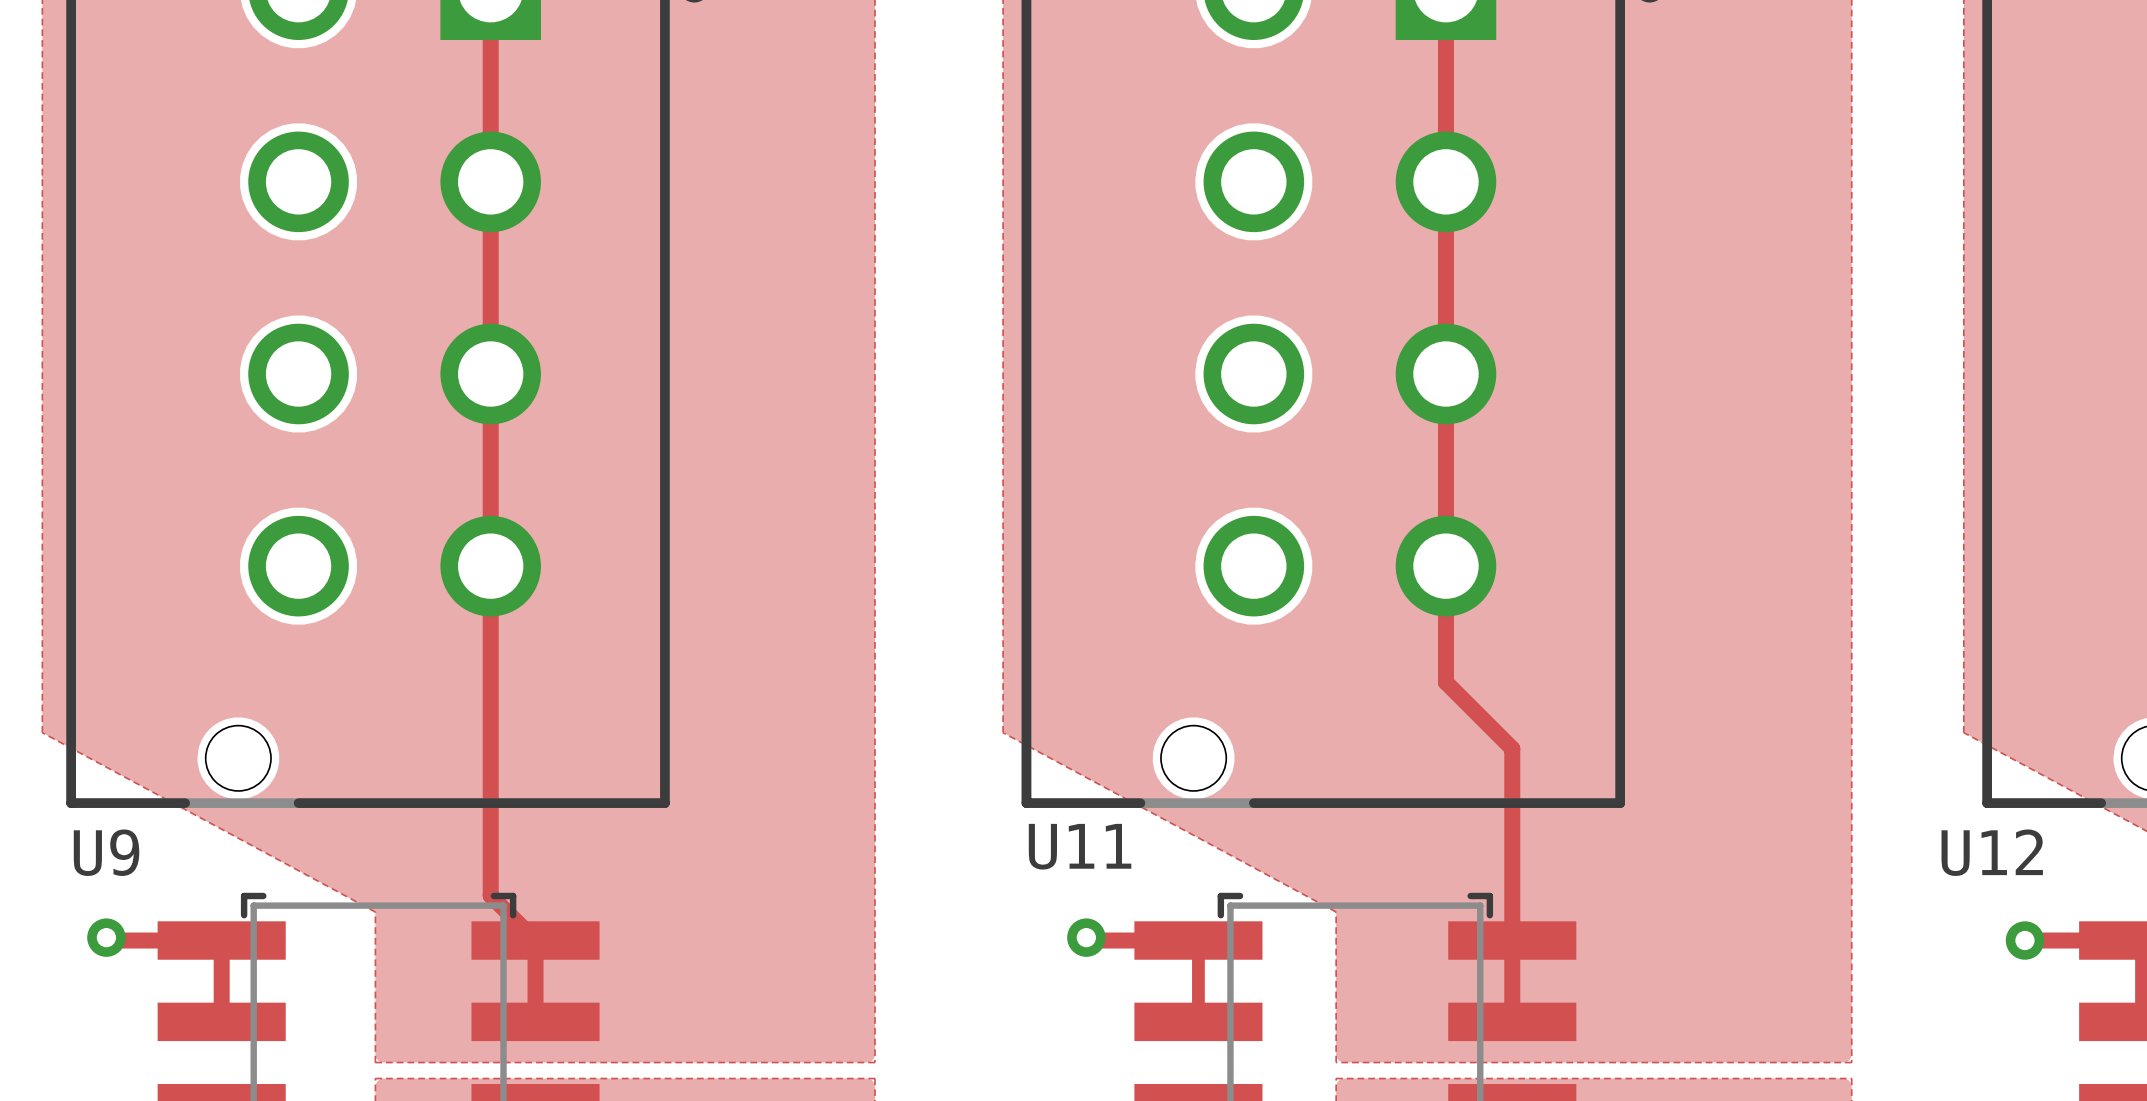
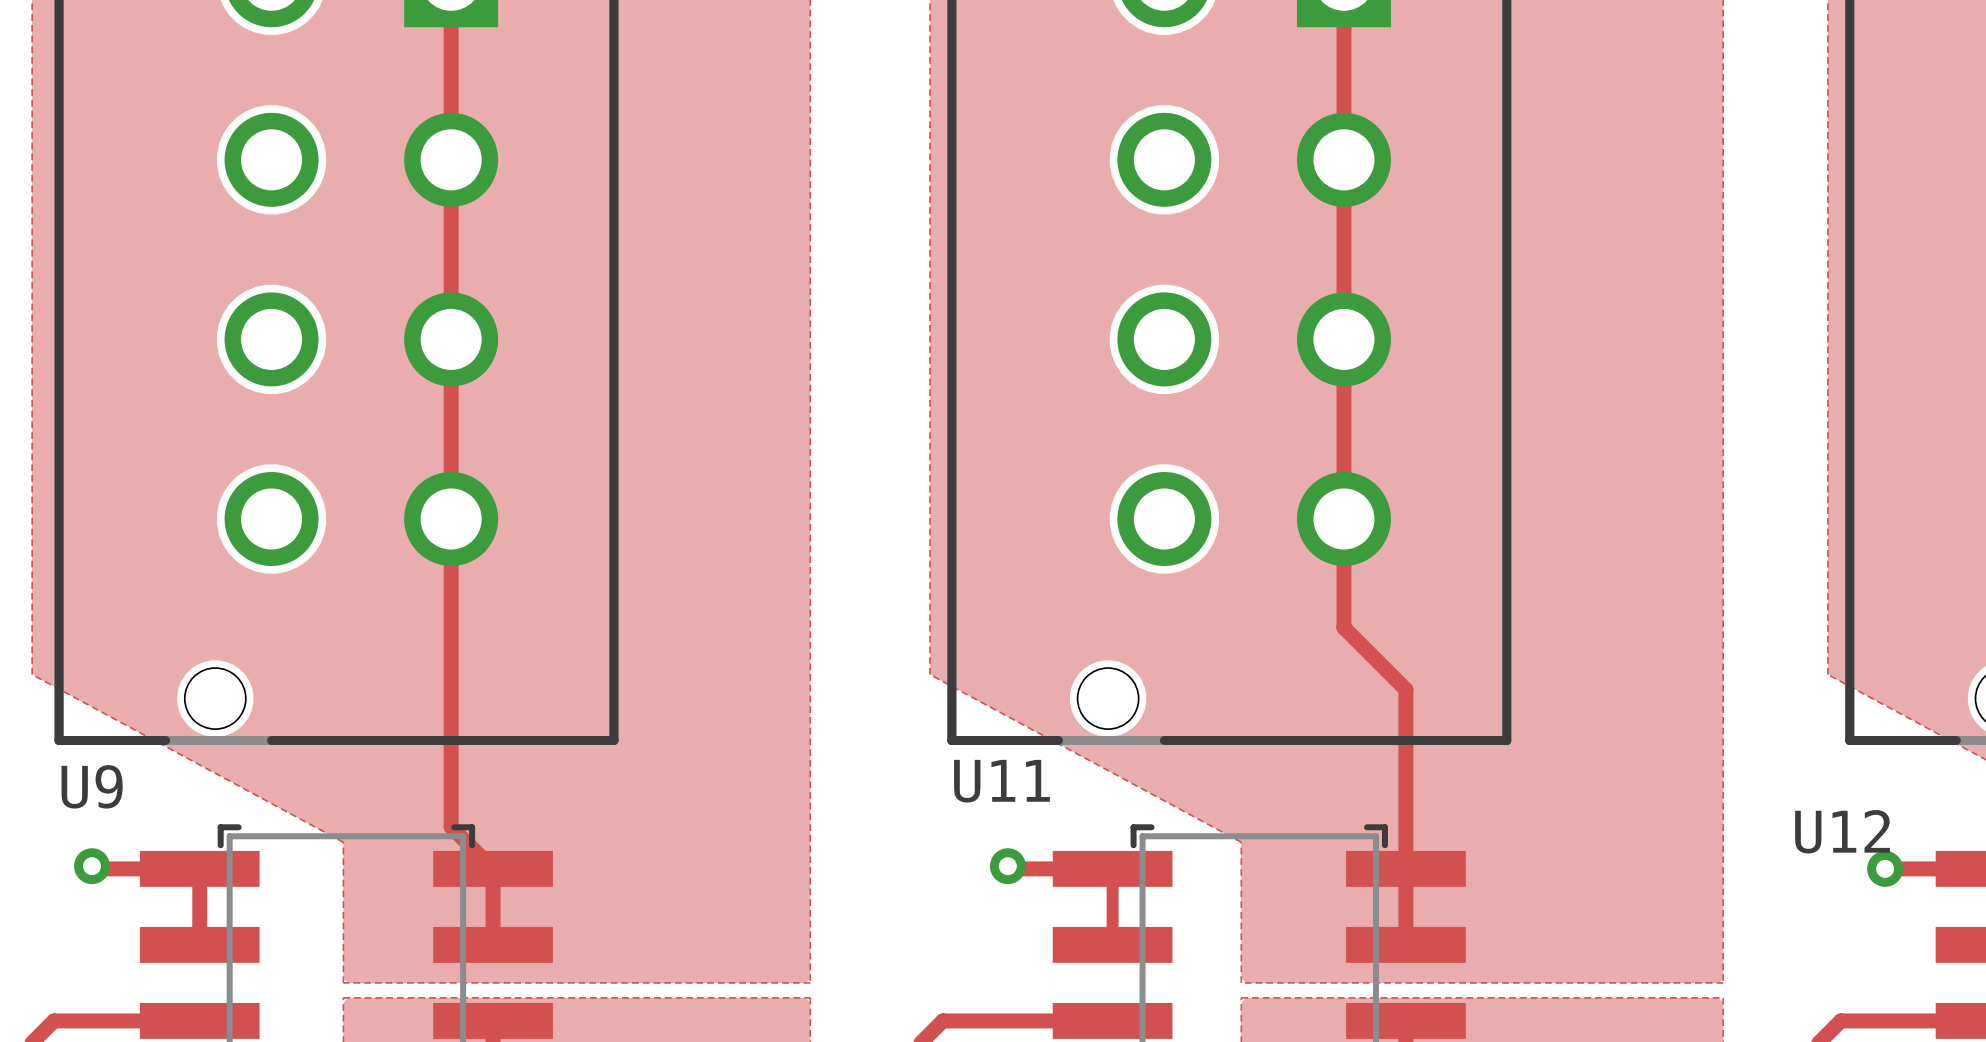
U12 name position: U12 (1992, 852) -> U12 (1842, 831)

